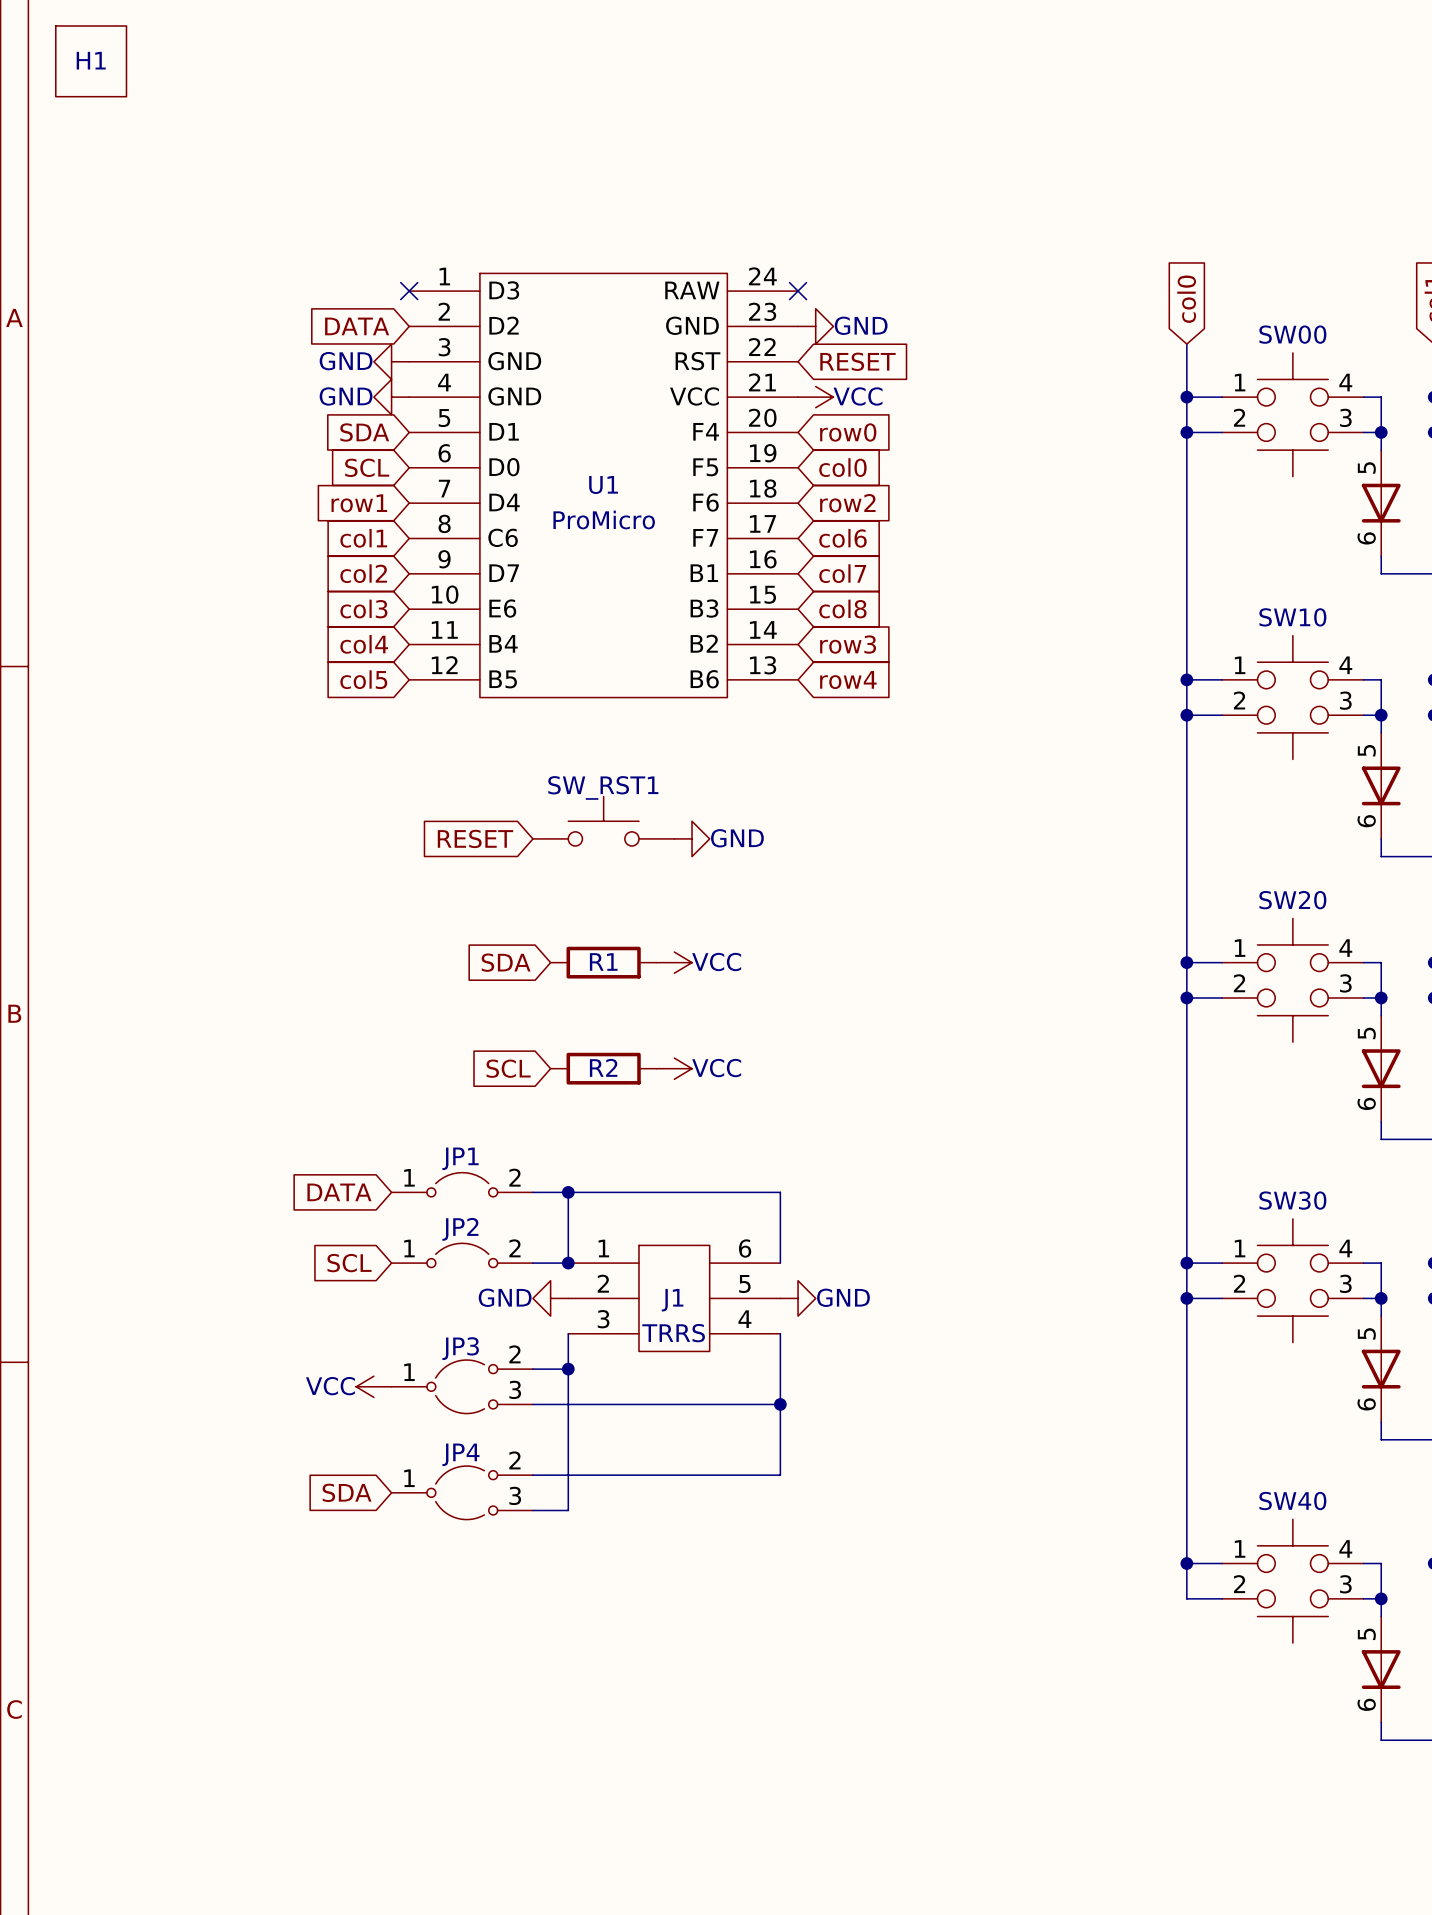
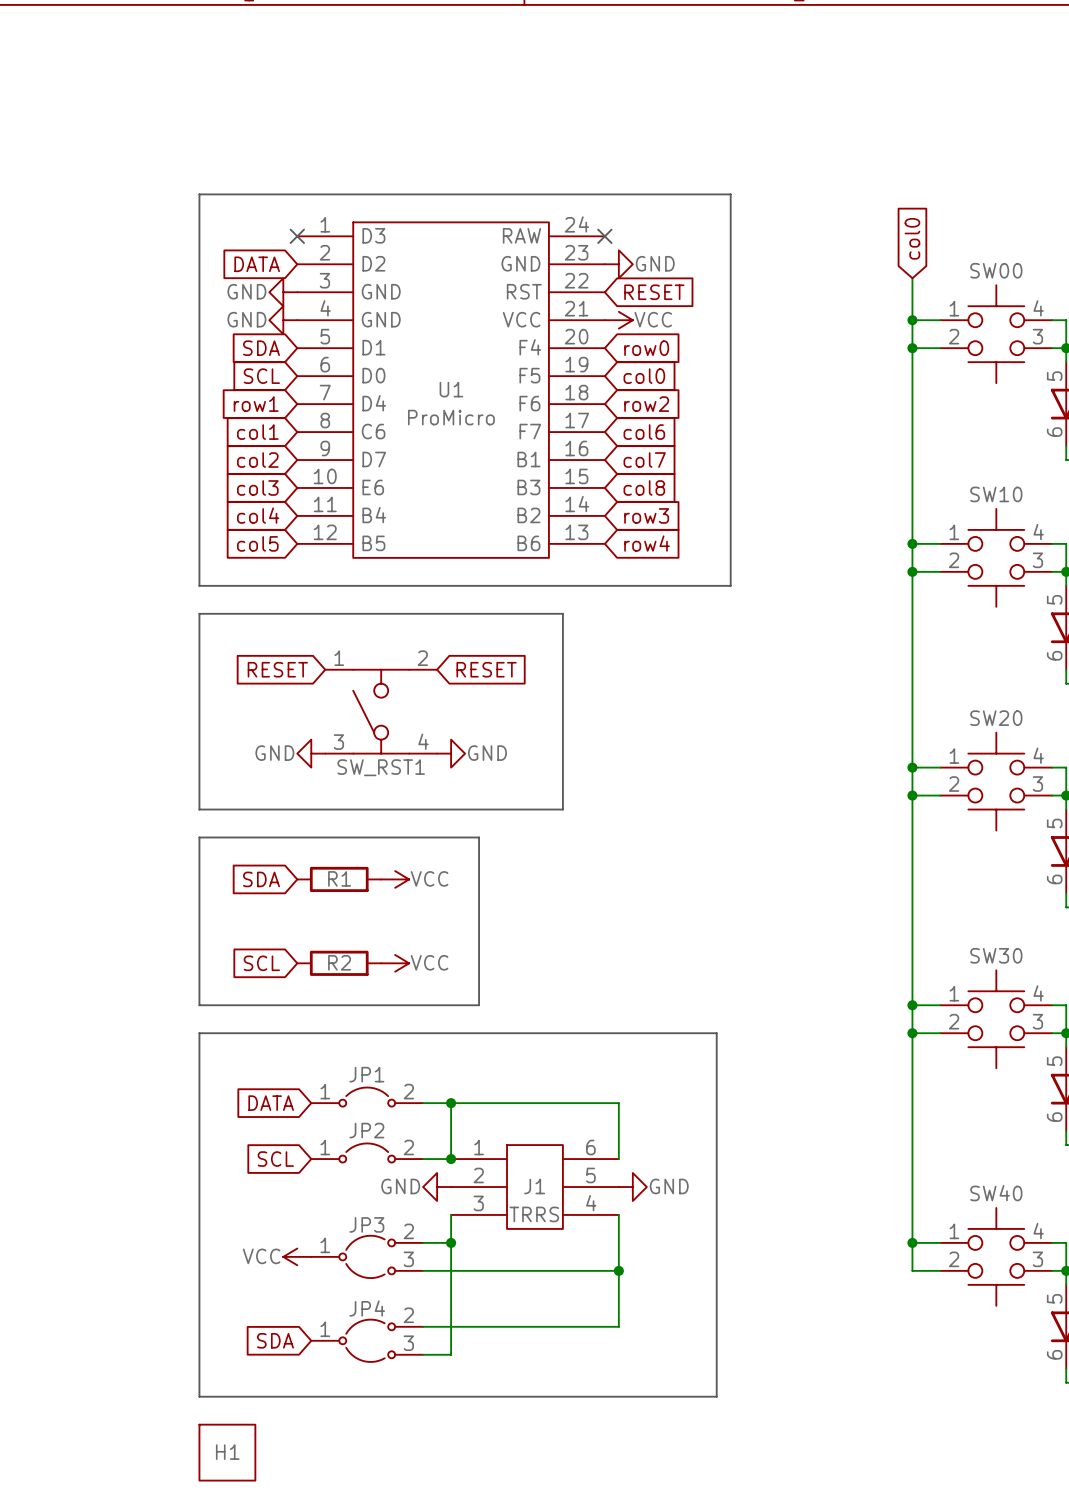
H1 position: (91, 61) -> (227, 1452)
line: none -> (199, 194) (730, 194) (730, 585) (199, 585) (199, 194)
line: none -> (199, 613) (199, 809) (562, 809) (562, 613) (199, 613)
SW_RST1 name position: SW_RST1 (603, 787) -> SW_RST1 (381, 767)
SW_RST1 symbol: [532, 796, 675, 847] -> [325, 669, 438, 754]
global label position: RESET (475, 838) -> RESET (277, 669)
global label: none -> RESET (486, 669)
power symbol position: GND (692, 838) -> GND (451, 753)
power symbol: none -> GND (311, 753)
global label: SDA (506, 962) -> none
R1 position: (603, 962) -> (339, 879)
power symbol: VCC (674, 962) -> none
line: none -> (199, 837) (199, 1005) (479, 1005) (479, 837) (199, 837)
global label: SCL (508, 1068) -> none
R2 position: (603, 1068) -> (339, 963)
power symbol: VCC (674, 1068) -> none
global label: none -> SDA (261, 879)
power symbol: none -> VCC (395, 879)
JP1 position: (462, 1184) -> (367, 1097)
global label position: DATA (339, 1192) -> DATA (271, 1103)
wire: (532, 1192) (780, 1192) (780, 1263) -> (423, 1103) (618, 1103) (618, 1159)
wire: (568, 1192) (568, 1263) (532, 1263) -> (451, 1103) (451, 1159) (423, 1159)
junction: (568, 1192) -> none
power symbol: none -> VCC (395, 963)
JP2 position: (462, 1255) -> (367, 1152)
global label position: SCL (349, 1263) -> SCL (261, 963)
junction: (568, 1263) -> none
line: none -> (199, 1033) (199, 1396) (716, 1396) (716, 1033) (199, 1033)
power symbol: GND (550, 1298) -> none
J1 position: (674, 1298) -> (534, 1187)
power symbol: GND (798, 1298) -> none
wire: (568, 1333) (568, 1510) (532, 1510) -> (451, 1214) (451, 1354) (423, 1354)
wire: (780, 1333) (780, 1475) (532, 1475) -> (618, 1214) (618, 1326) (423, 1326)
wire: (532, 1369) (568, 1369) -> (423, 1242) (451, 1242)
junction position: (568, 1369) -> (451, 1103)
power symbol: VCC (373, 1386) -> none
JP3 position: (462, 1386) -> (367, 1256)
wire: (532, 1404) (780, 1404) -> (423, 1270) (618, 1270)
junction: (780, 1404) -> none
global label: none -> SCL (275, 1159)
junction: none -> (451, 1159)
global label: SDA (347, 1492) -> none
JP4 position: (462, 1492) -> (367, 1340)
power symbol: none -> GND (437, 1187)
power symbol: none -> GND (632, 1187)
junction: none -> (451, 1242)
power symbol: none -> VCC (297, 1256)
junction: none -> (618, 1270)
global label: none -> SDA (275, 1340)

